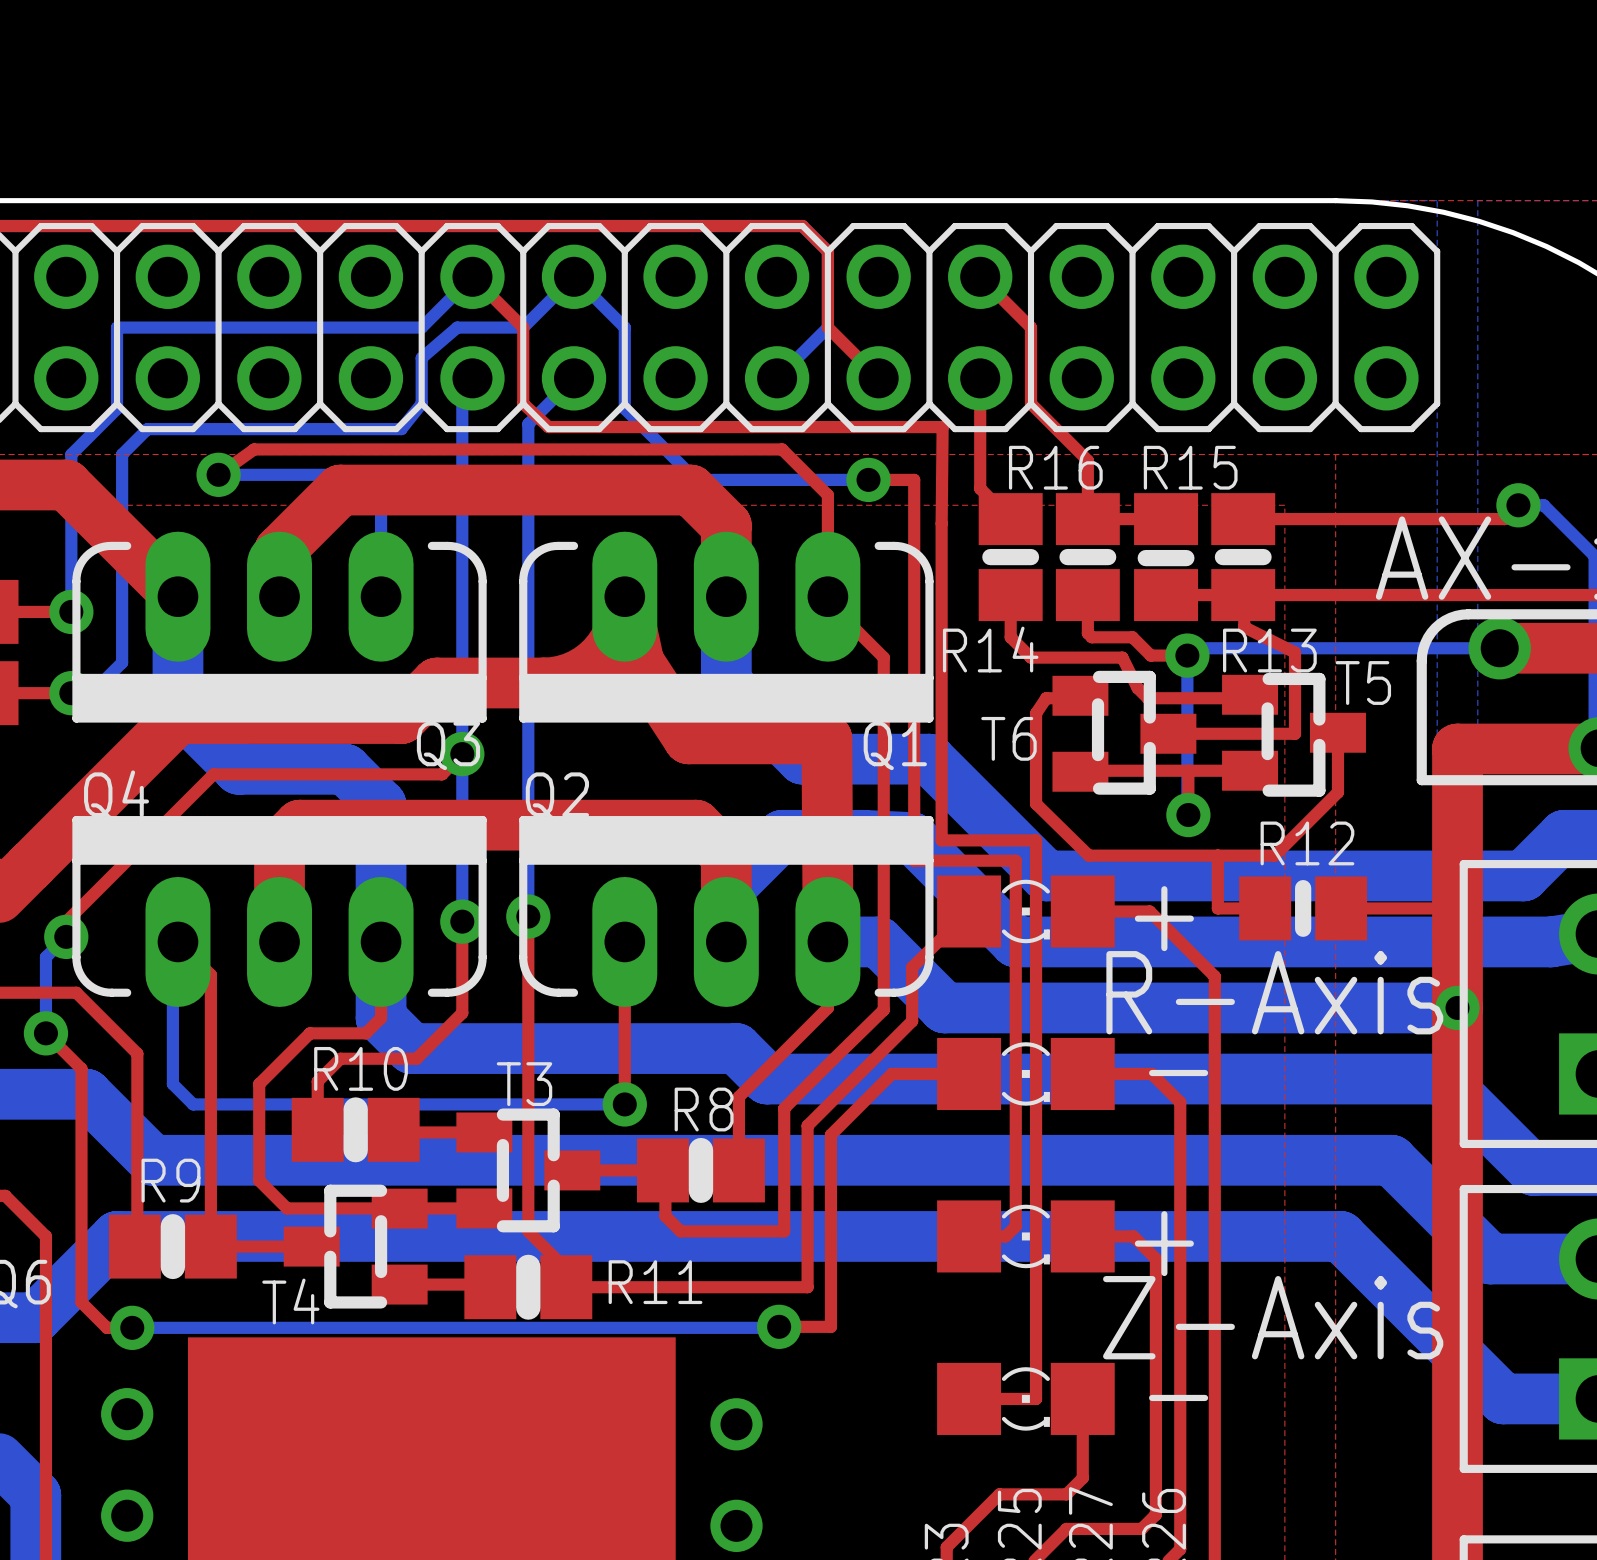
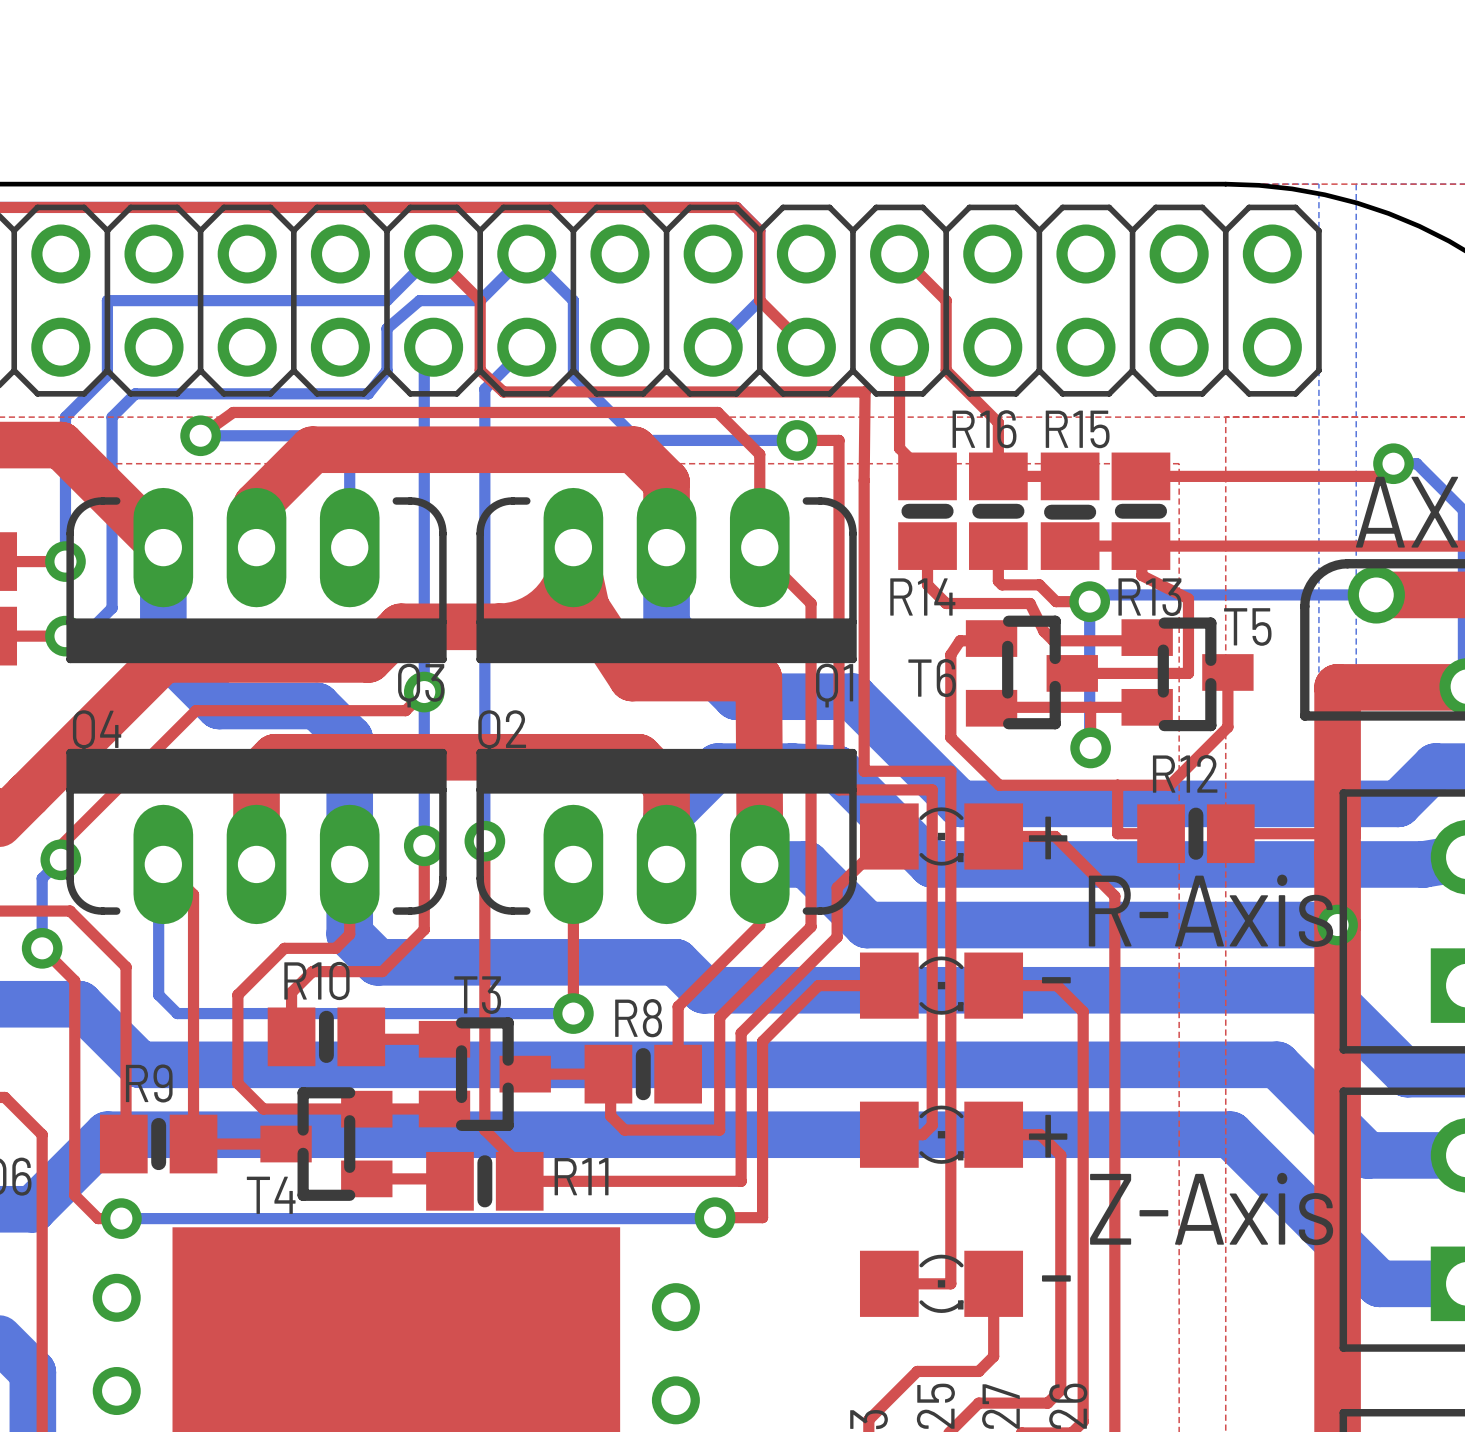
line width: thick (355, 1109) (355, 1150) -> thin (326, 1018) (326, 1055)
line width: thick (700, 1150) (700, 1190) -> thin (643, 1055) (643, 1092)
line width: thick (172, 1226) (172, 1266) -> thin (158, 1125) (158, 1162)
line width: thick (528, 1266) (528, 1307) -> thin (484, 1162) (484, 1199)

